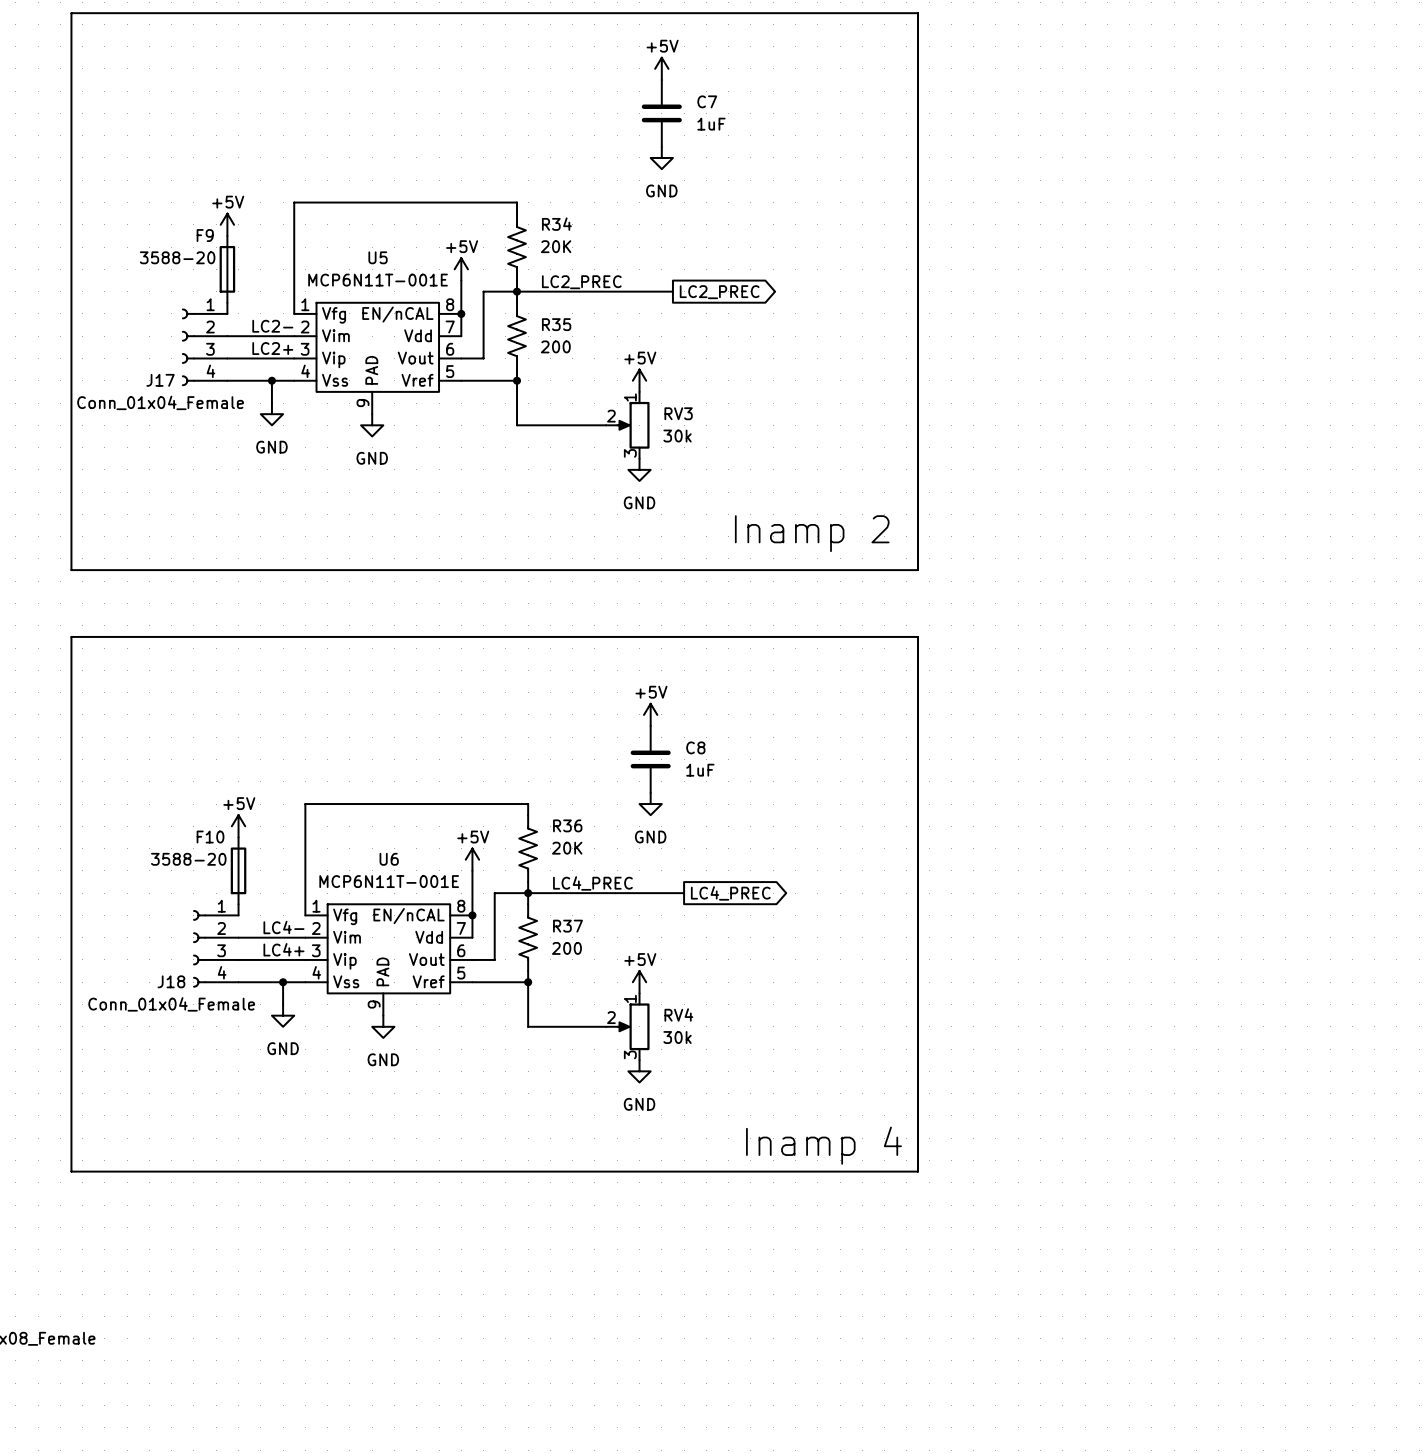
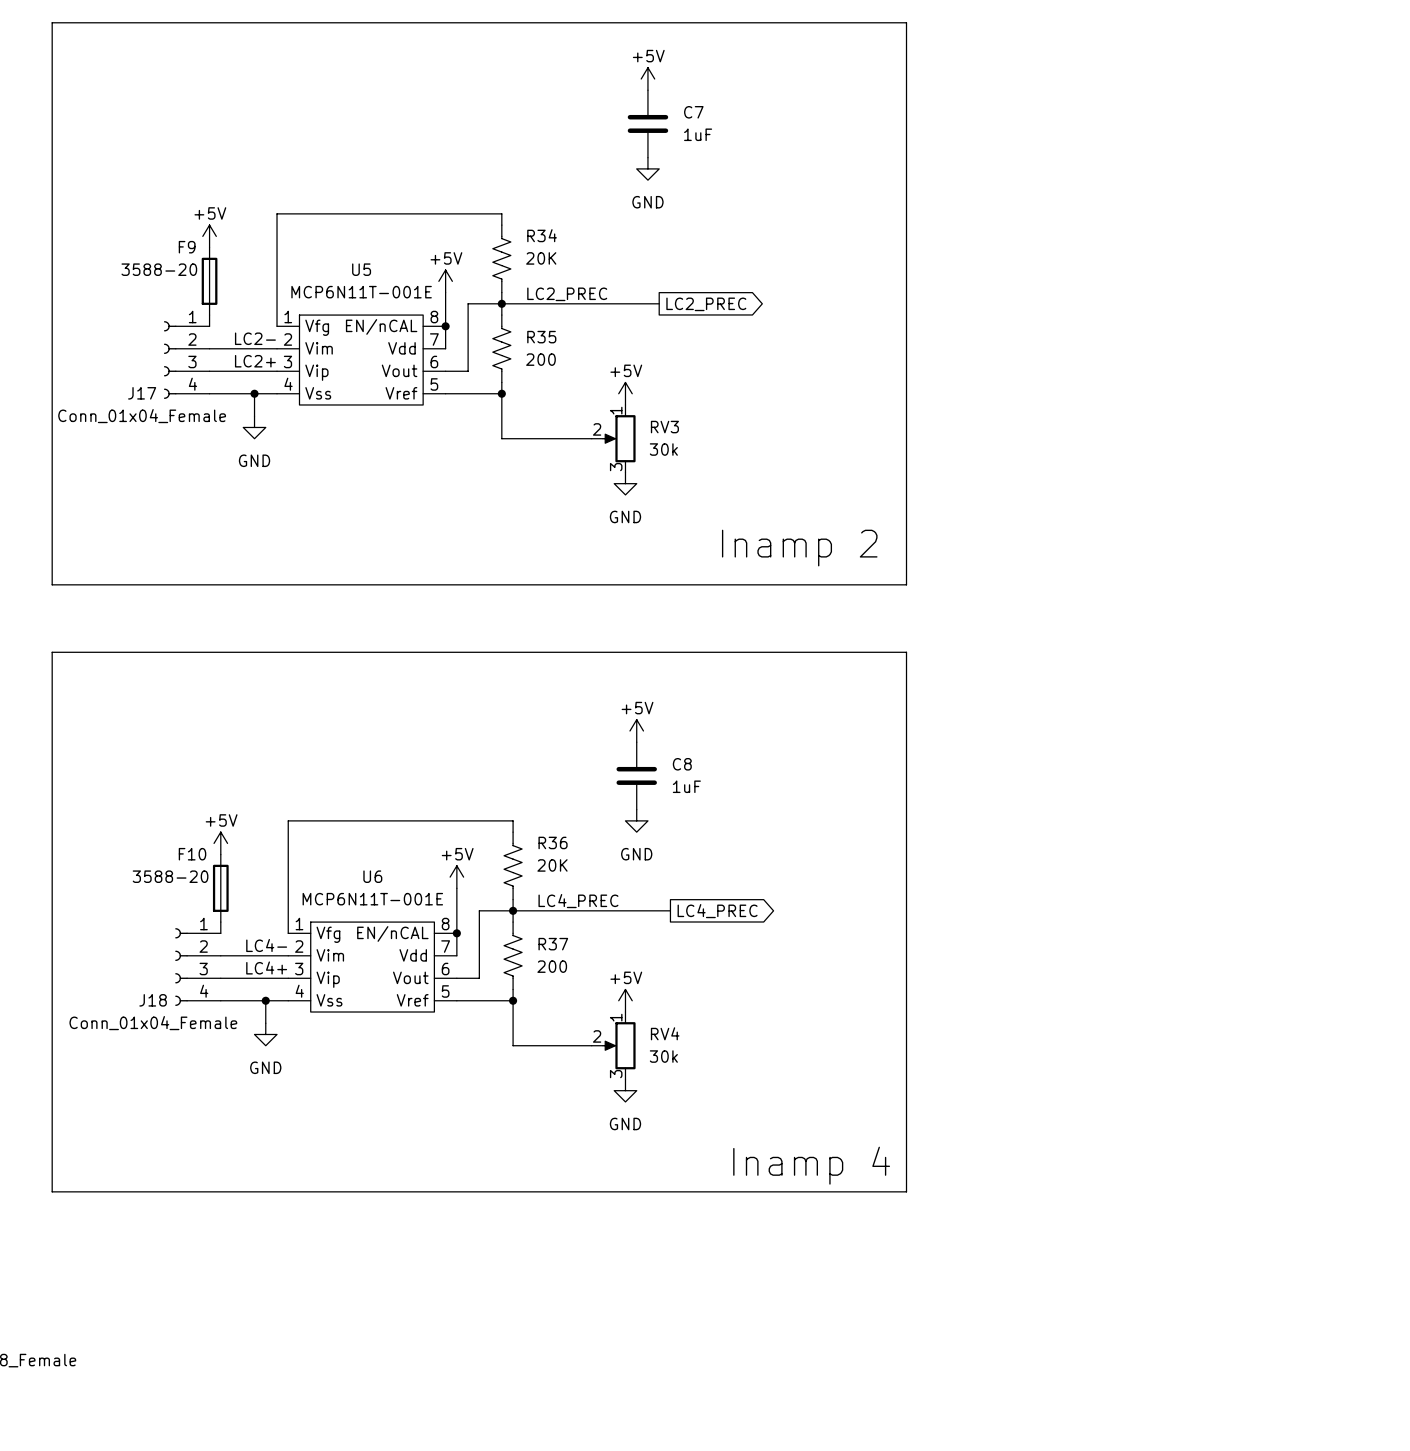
U5 symbol: [294, 302, 462, 415] -> [277, 315, 446, 405]
power symbol: GND (372, 425) -> none
U6 symbol: [305, 904, 473, 1016] -> [288, 922, 457, 1013]
power symbol: GND (383, 1026) -> none

